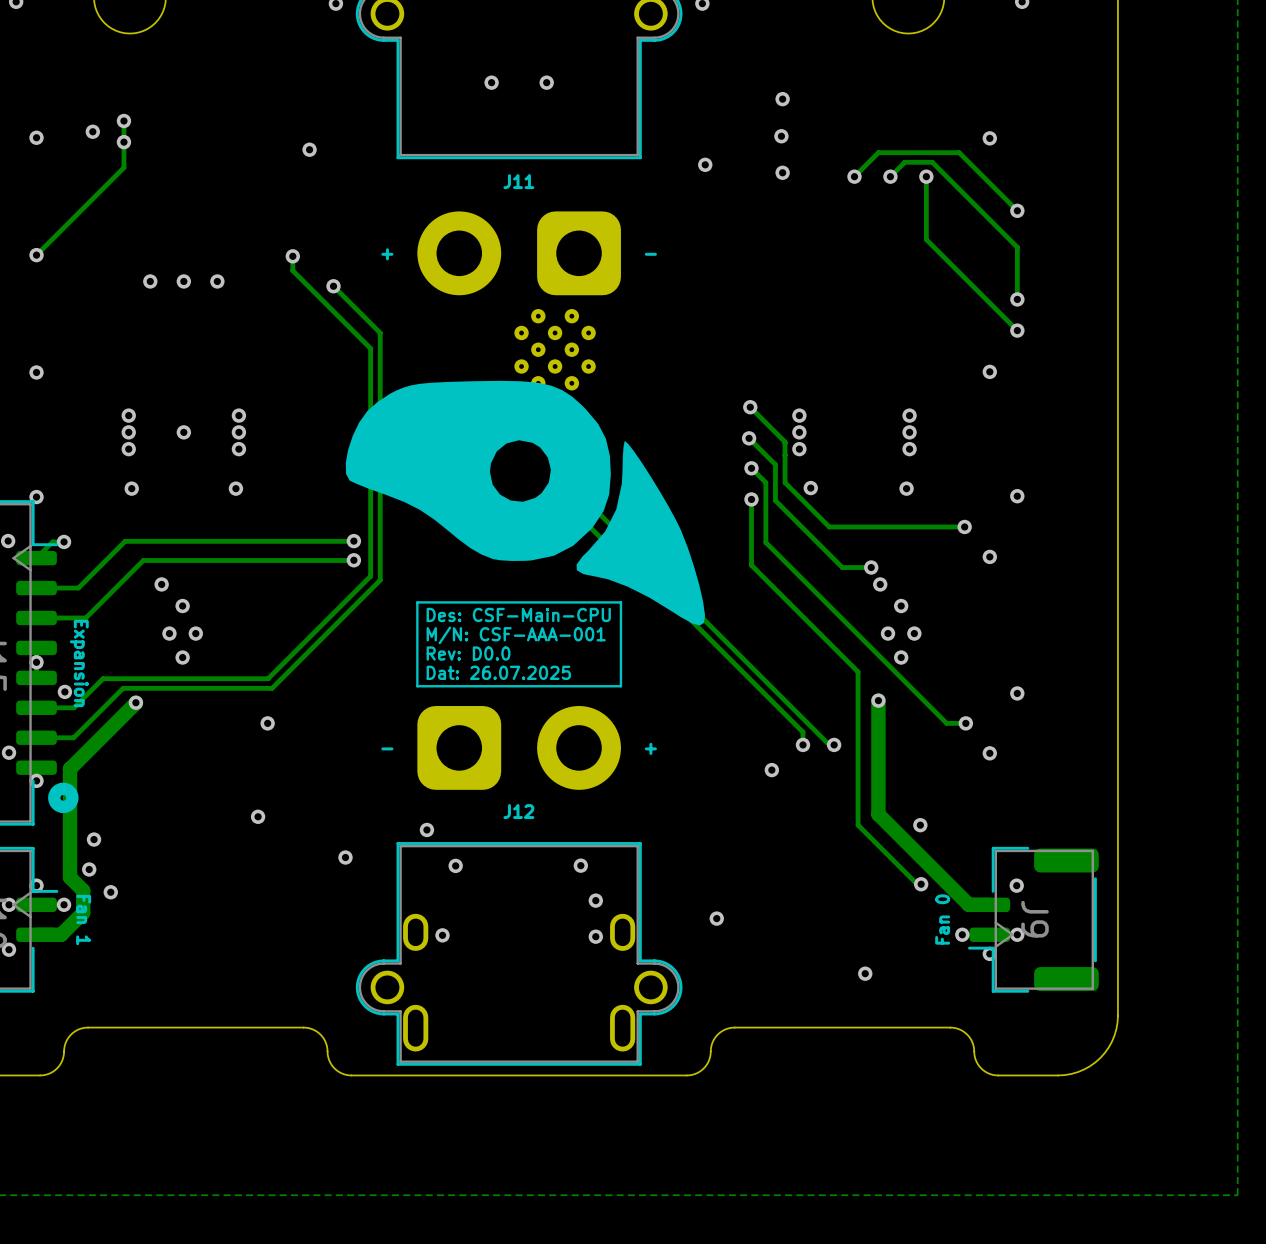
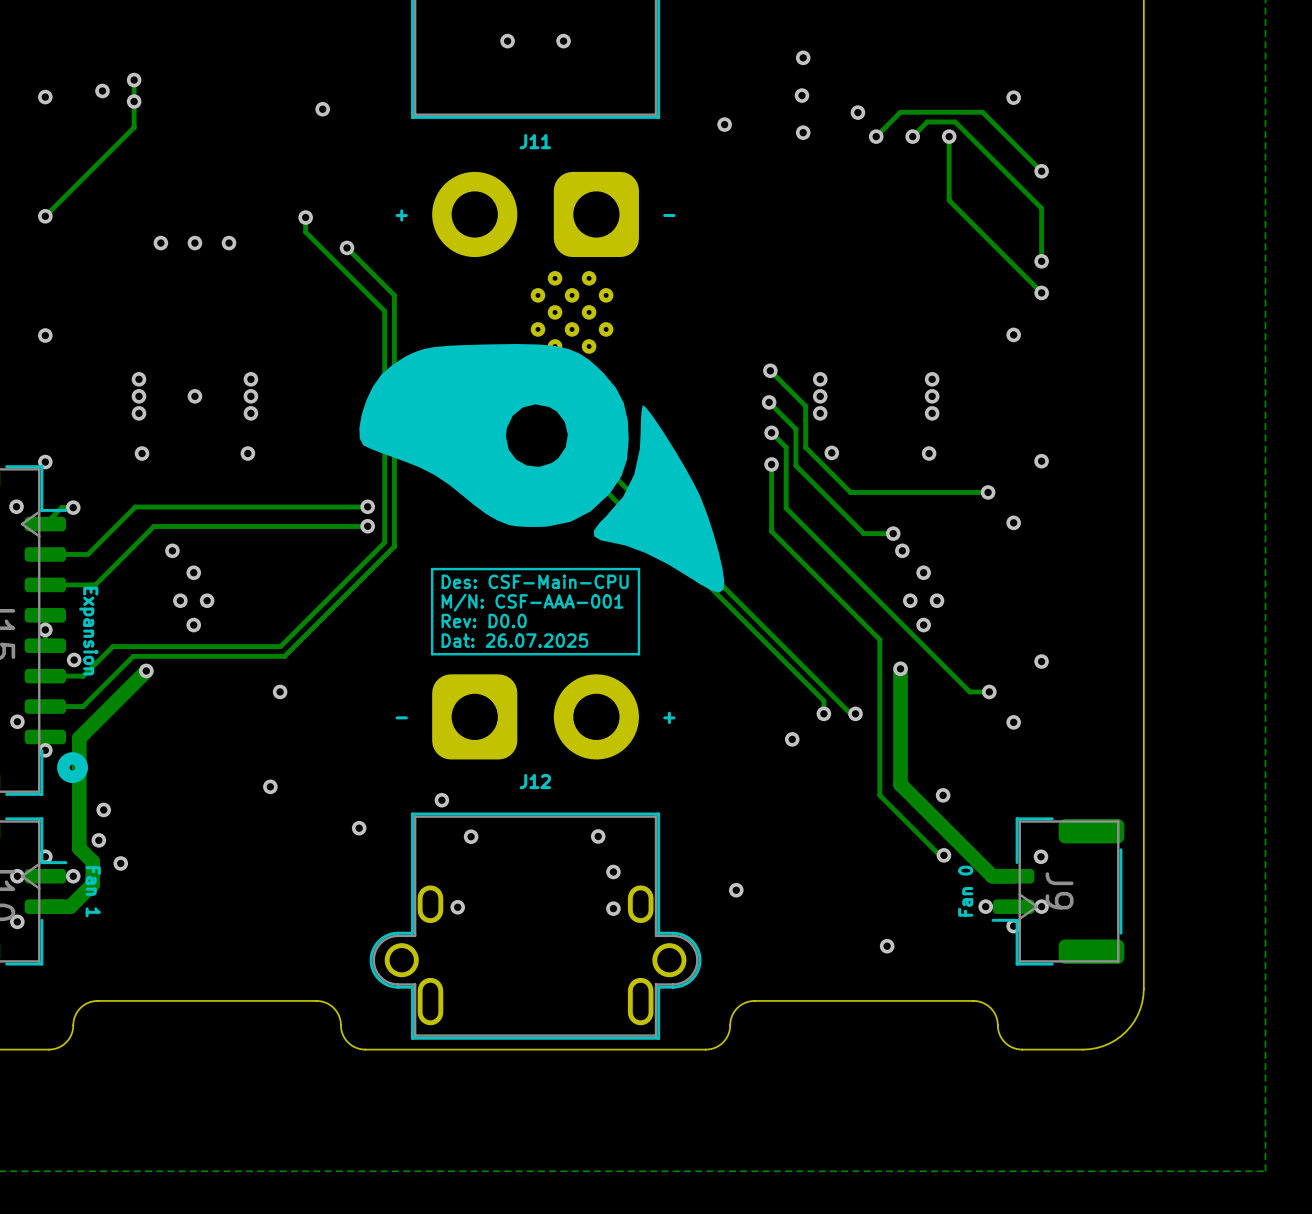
via: none -> (857, 112)

